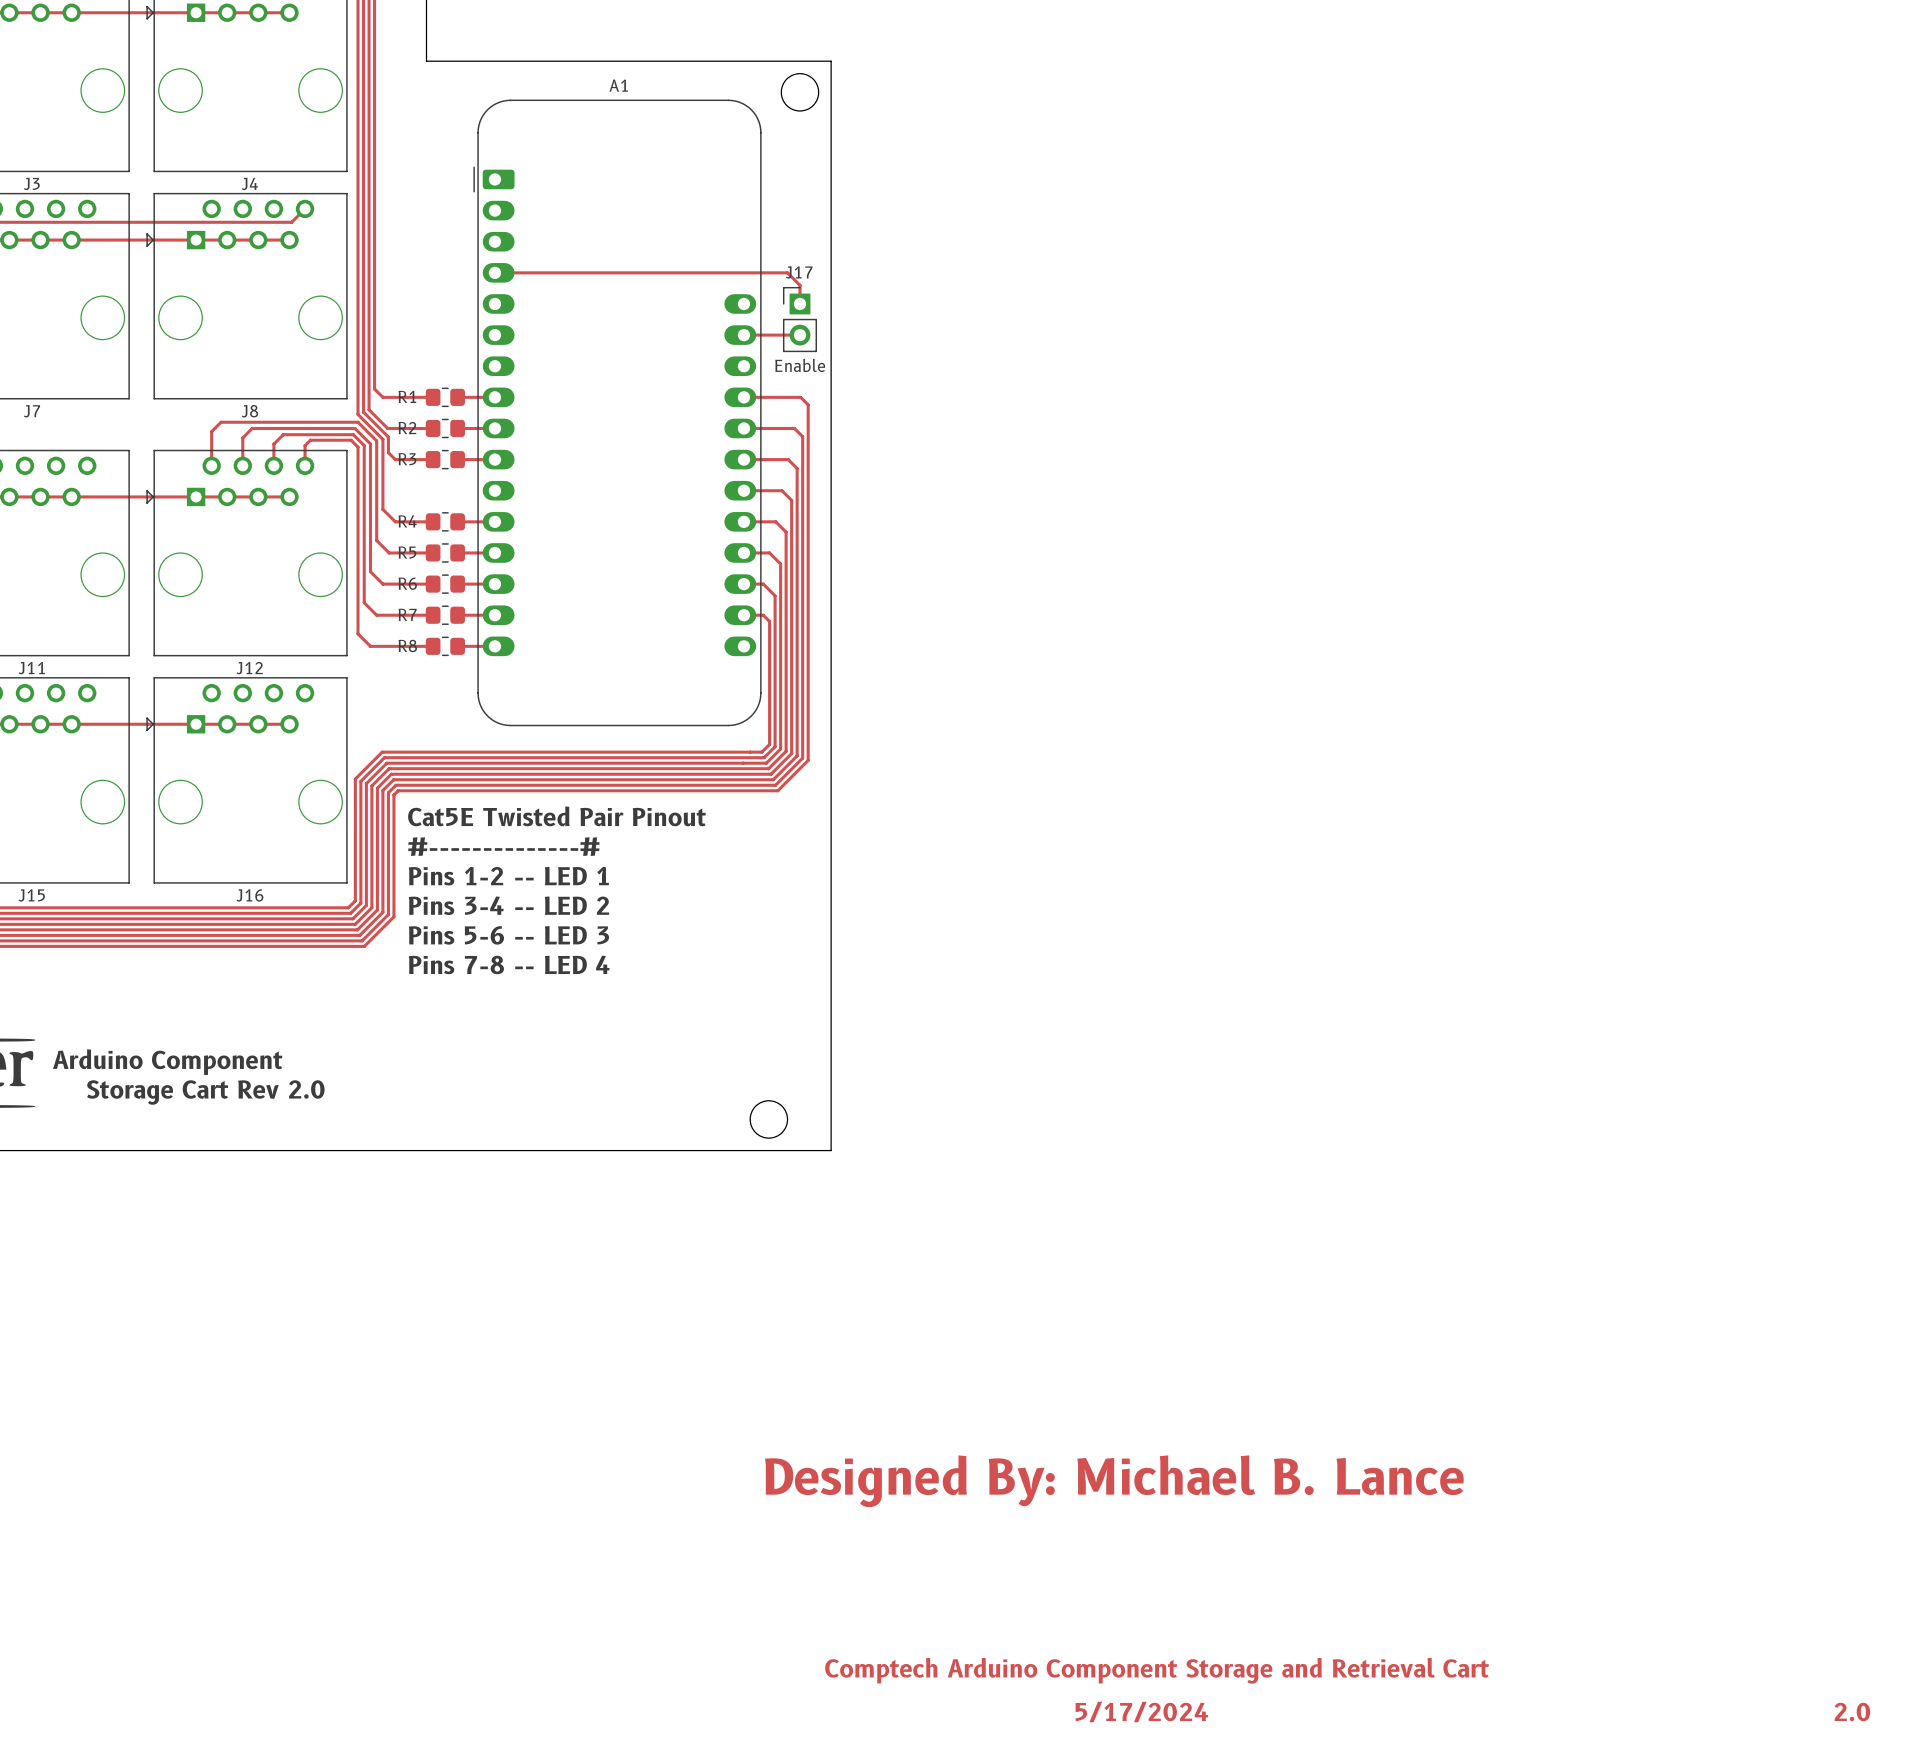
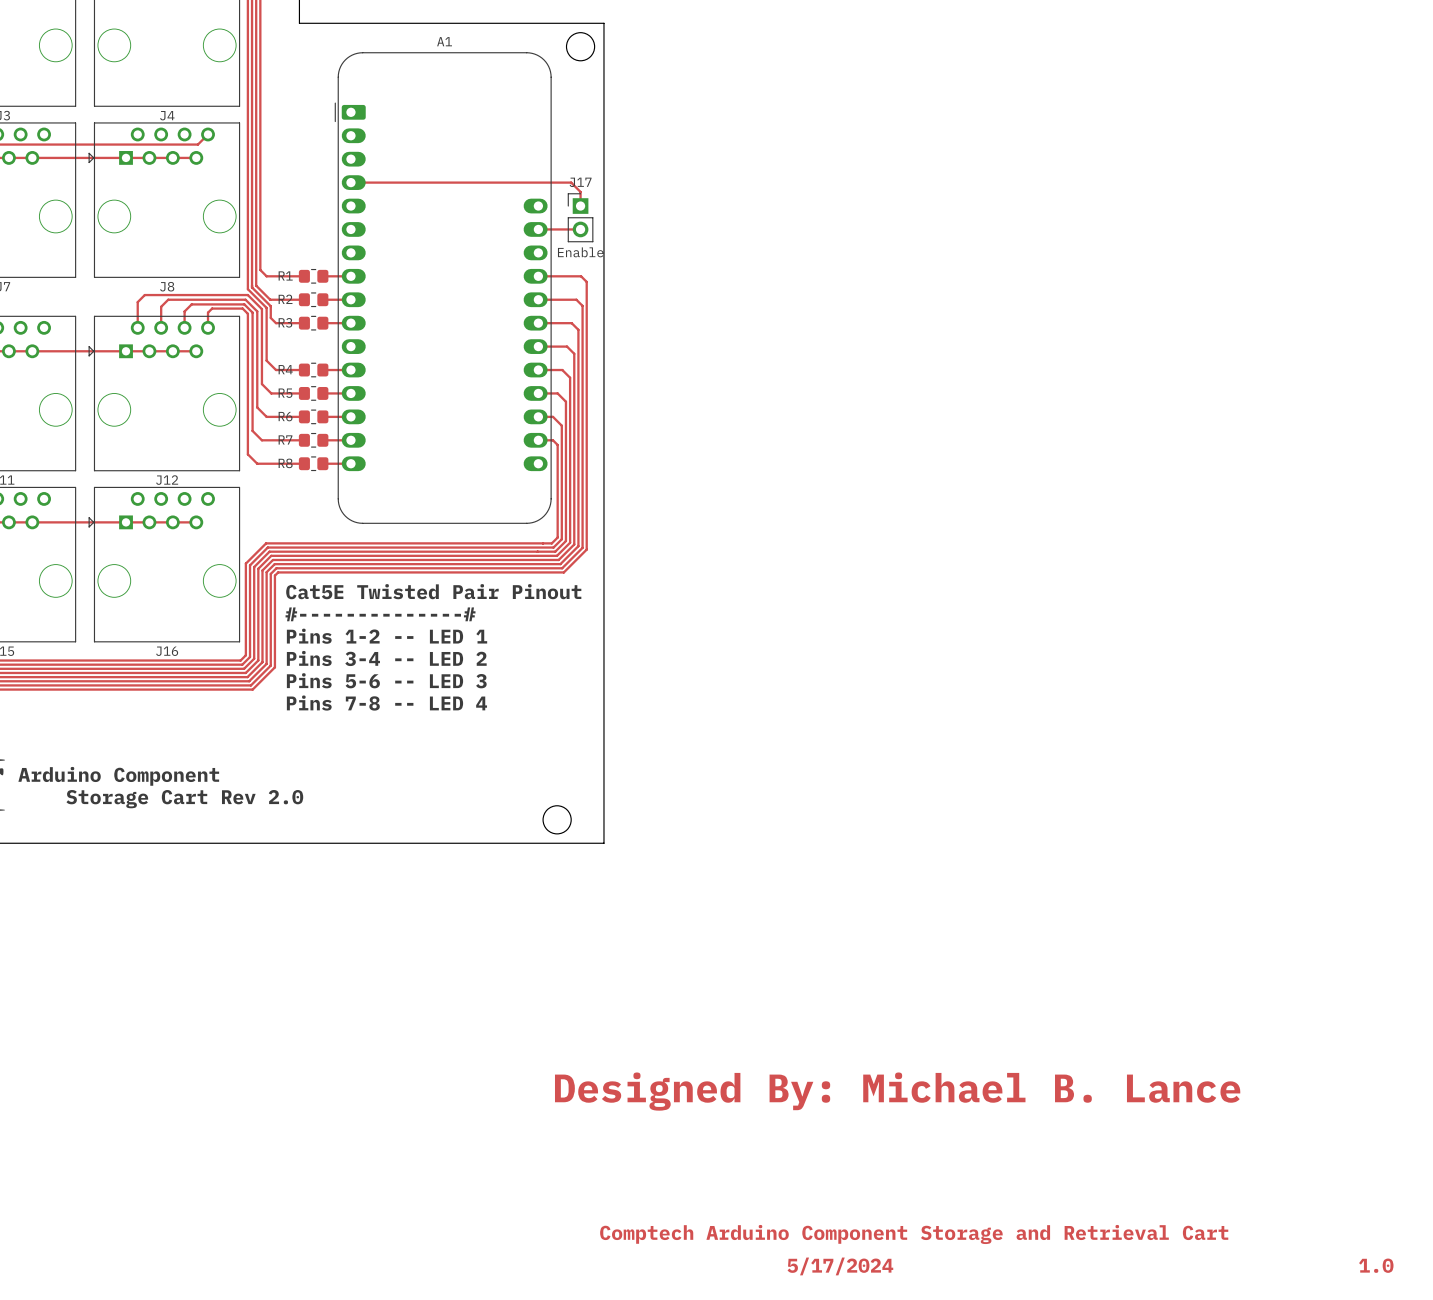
text: 2.0 (1852, 1712) -> 1.0 (1376, 1265)

